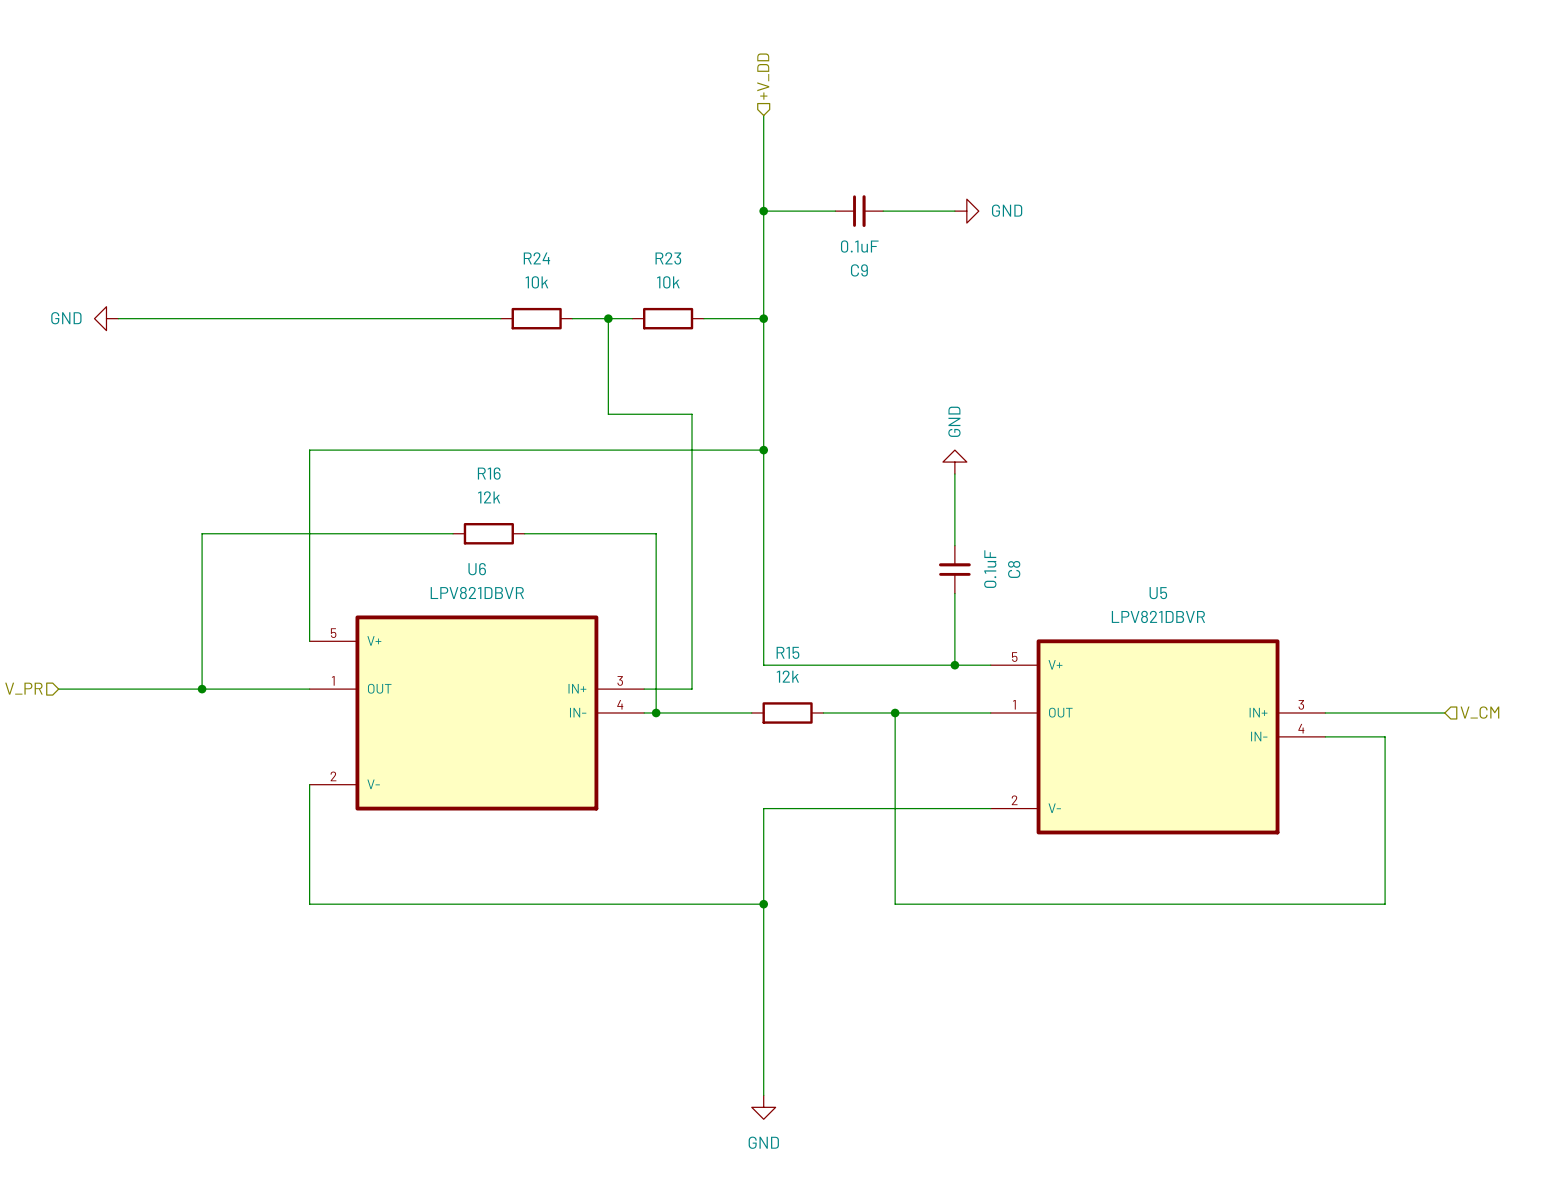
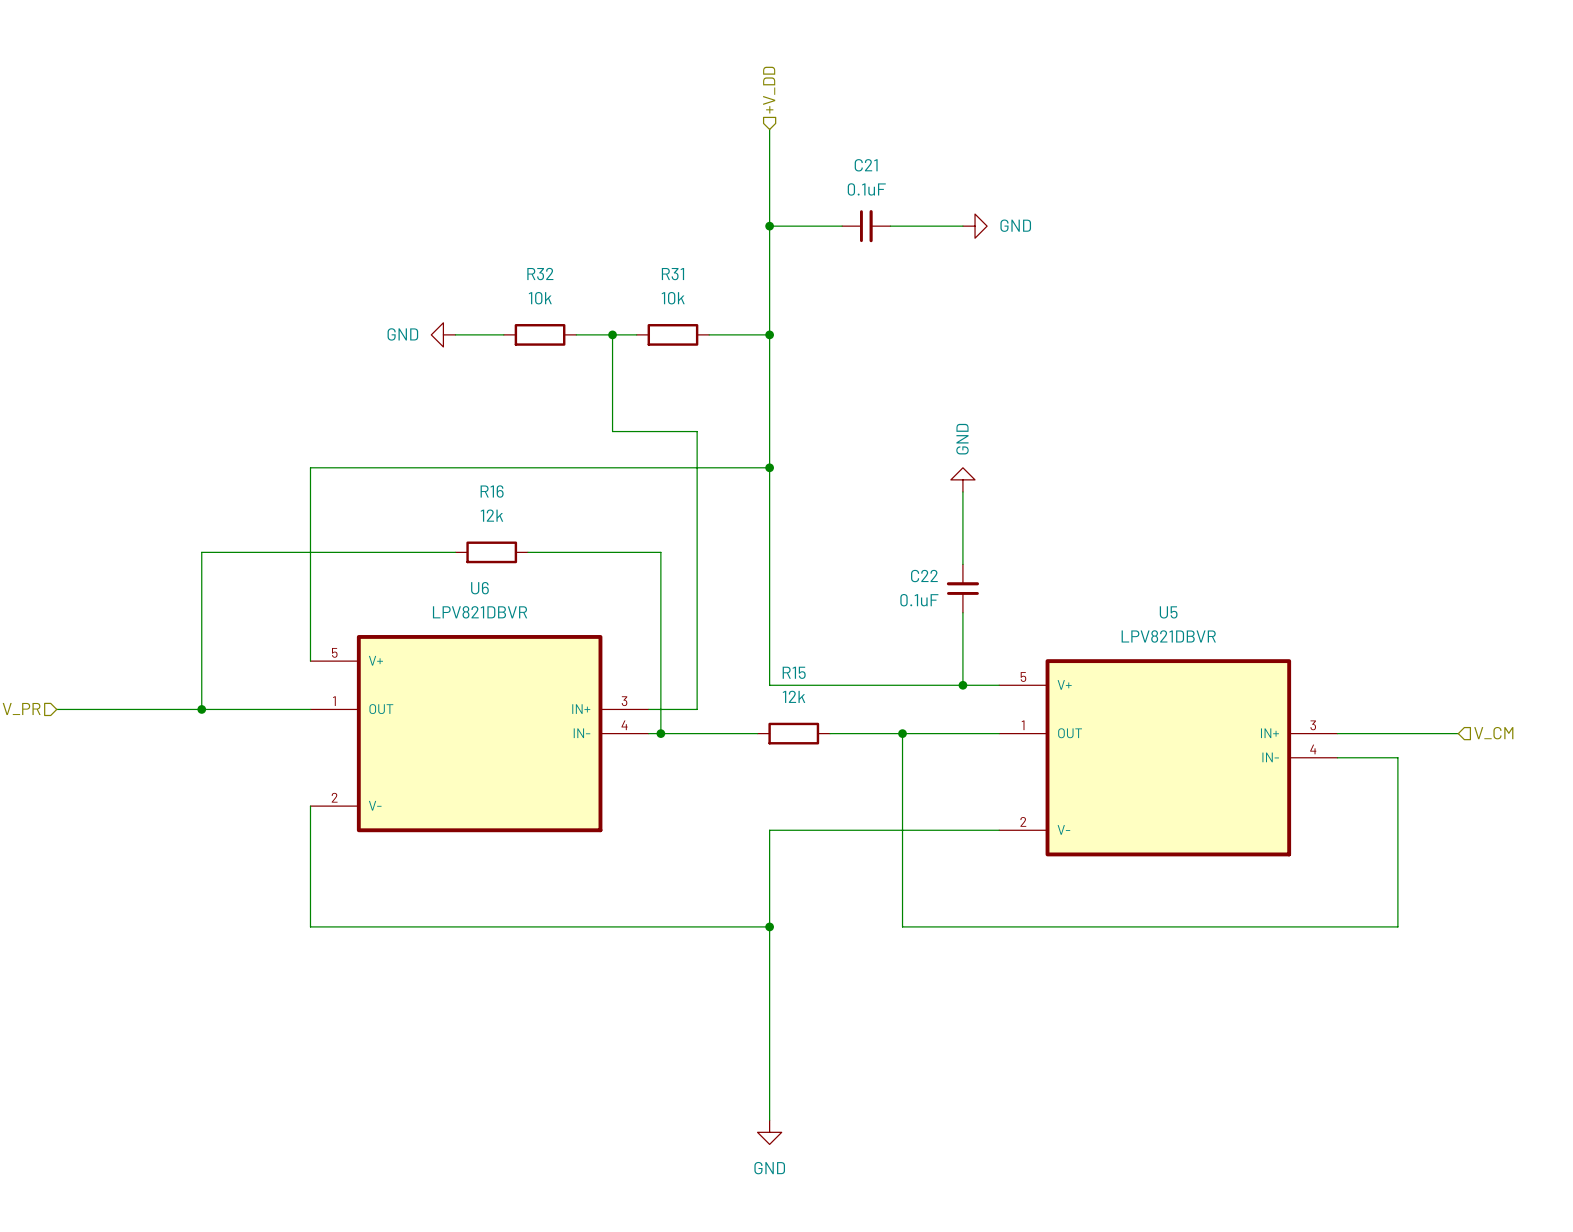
C9 value position: 0.1uF (859, 246) -> 0.1uF (866, 189)
R24 name: R24 (536, 258) -> R32 (540, 274)
R23 name: R23 (668, 258) -> R31 (672, 274)
C9 name: C9 (859, 270) -> C21 (866, 165)
power symbol: GND (106, 318) -> none
wire: (118, 318) (453, 318) -> none
power symbol: none -> GND (443, 334)
C8 value rotation: 0° (990, 569) -> 90° clockwise (919, 600)
C8 value position: 0.1uF (990, 569) -> 0.1uF (919, 600)
C8 name: C8 (1014, 569) -> C22 (924, 576)

